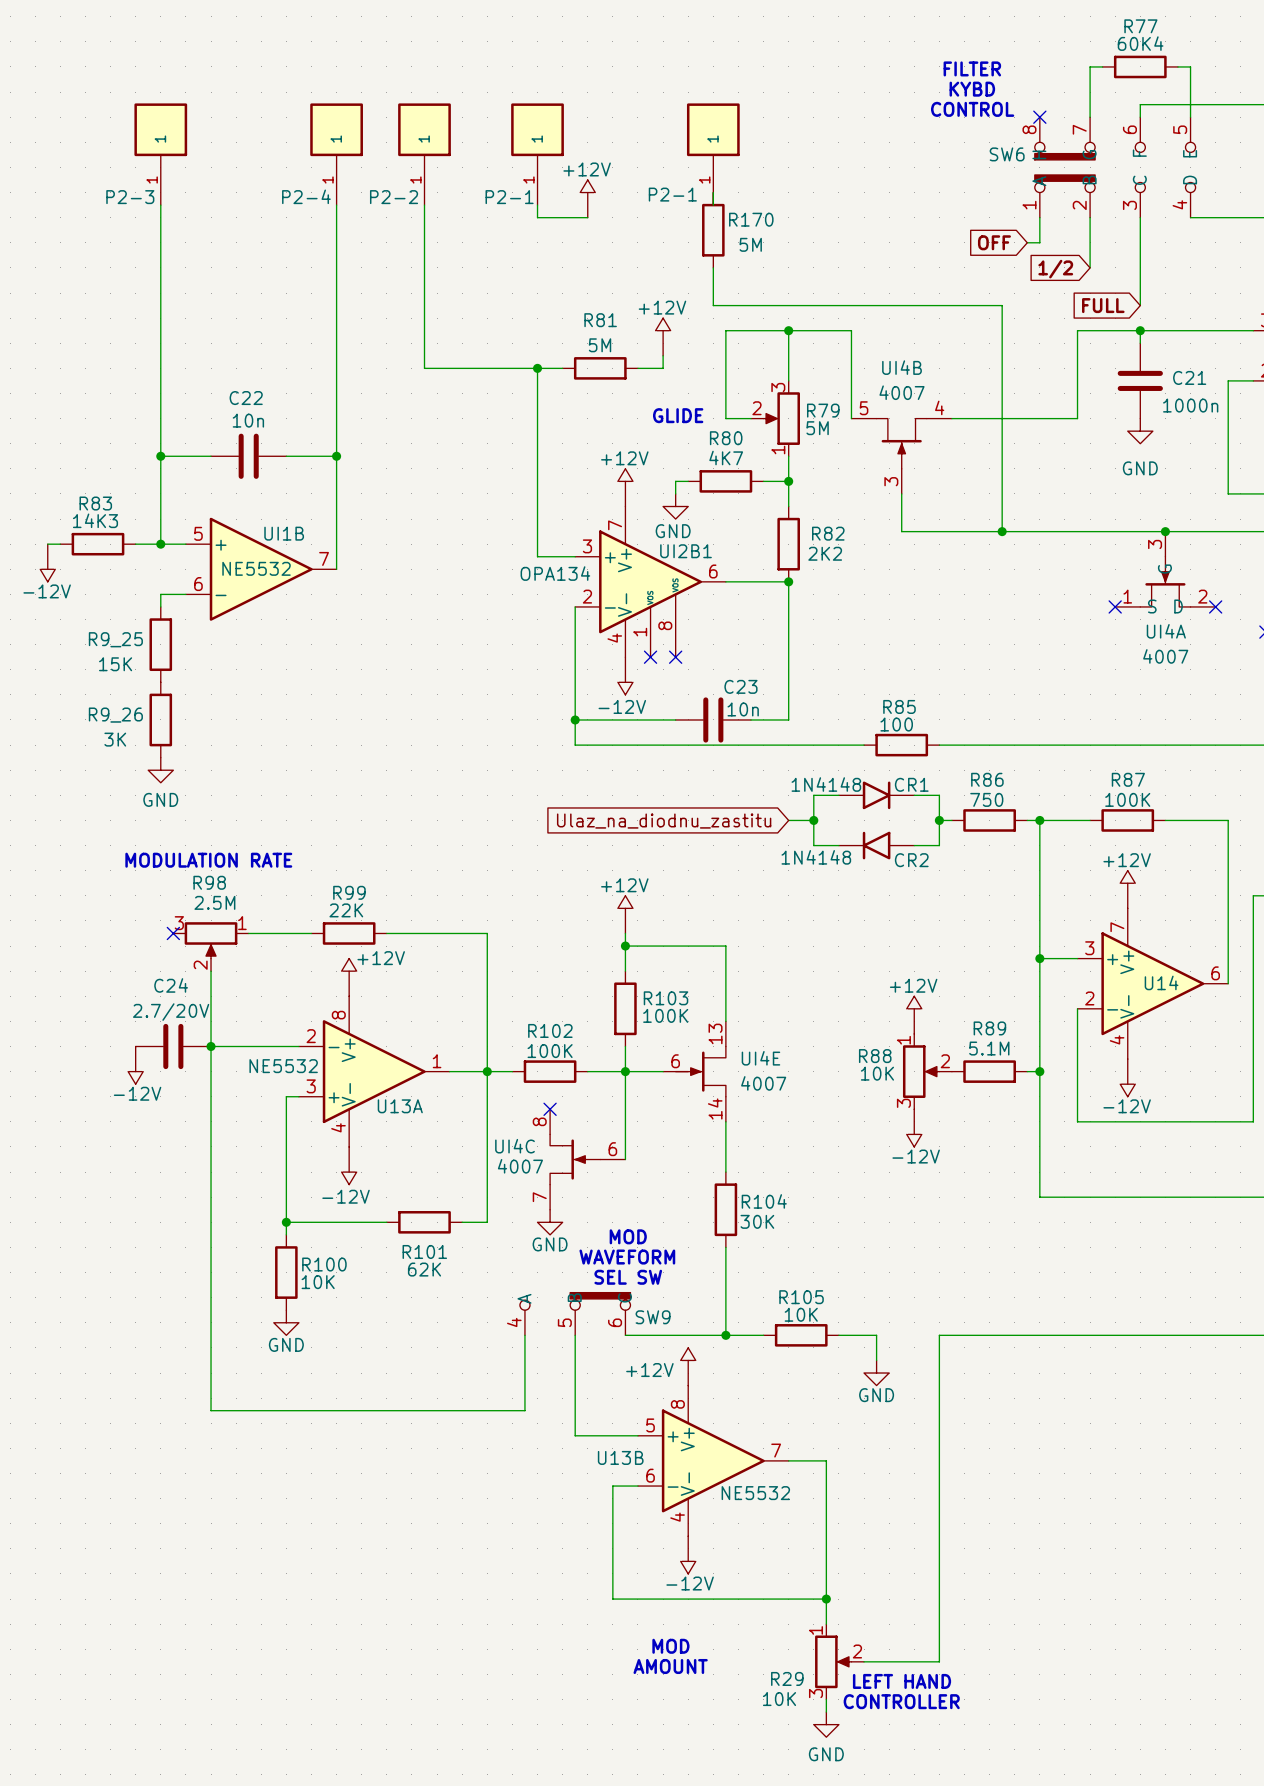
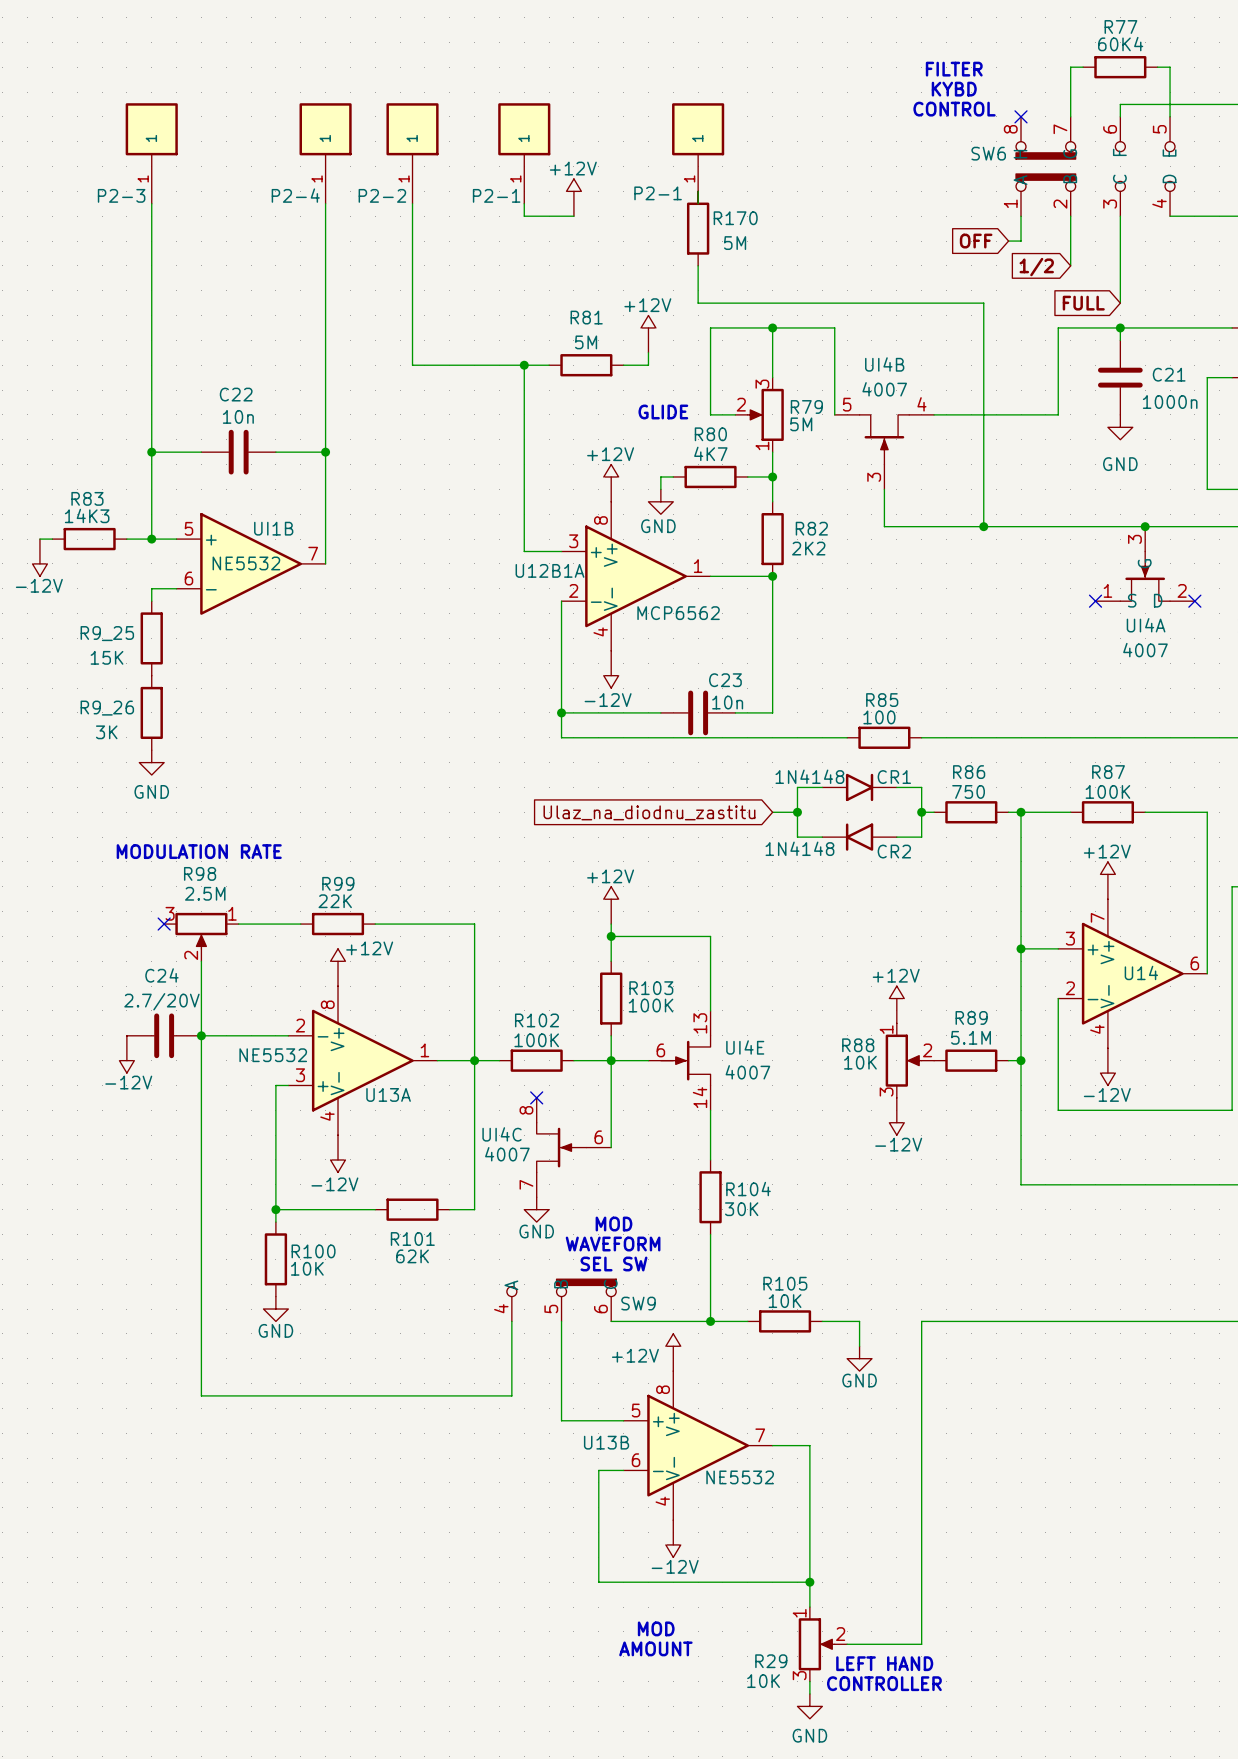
part: none -> (611, 576)
UI2B1: OPA134 (650, 581) -> none
U12B1A: none -> MCP6562 (636, 576)
no-connect mark: (650, 657) -> none
no-connect mark: (675, 657) -> none

